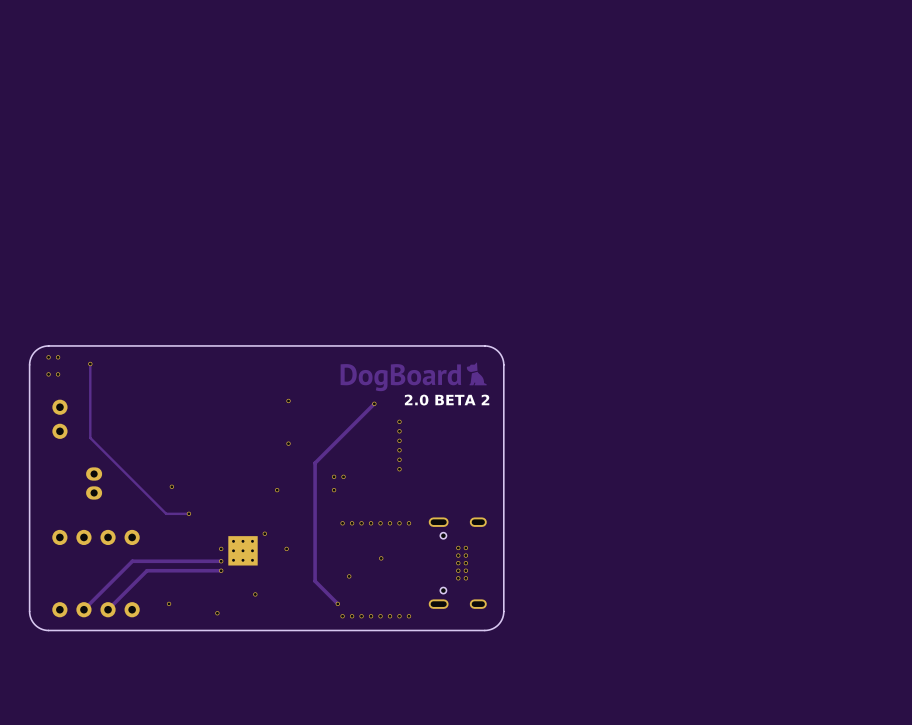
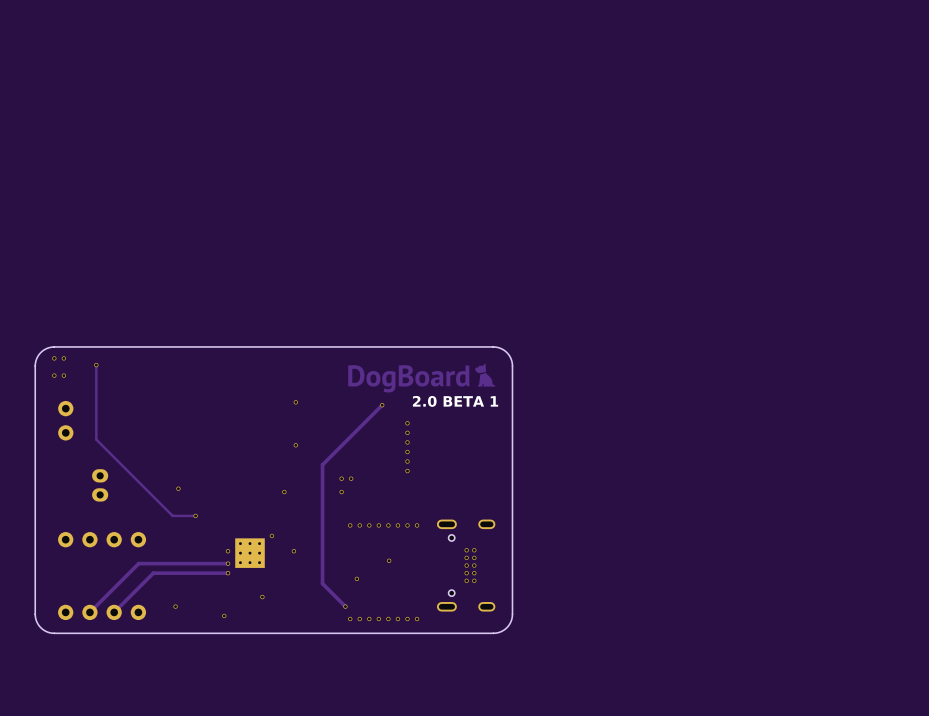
text: 2.0 BETA 2 (447, 400) -> 2.0 BETA 1 (455, 401)

